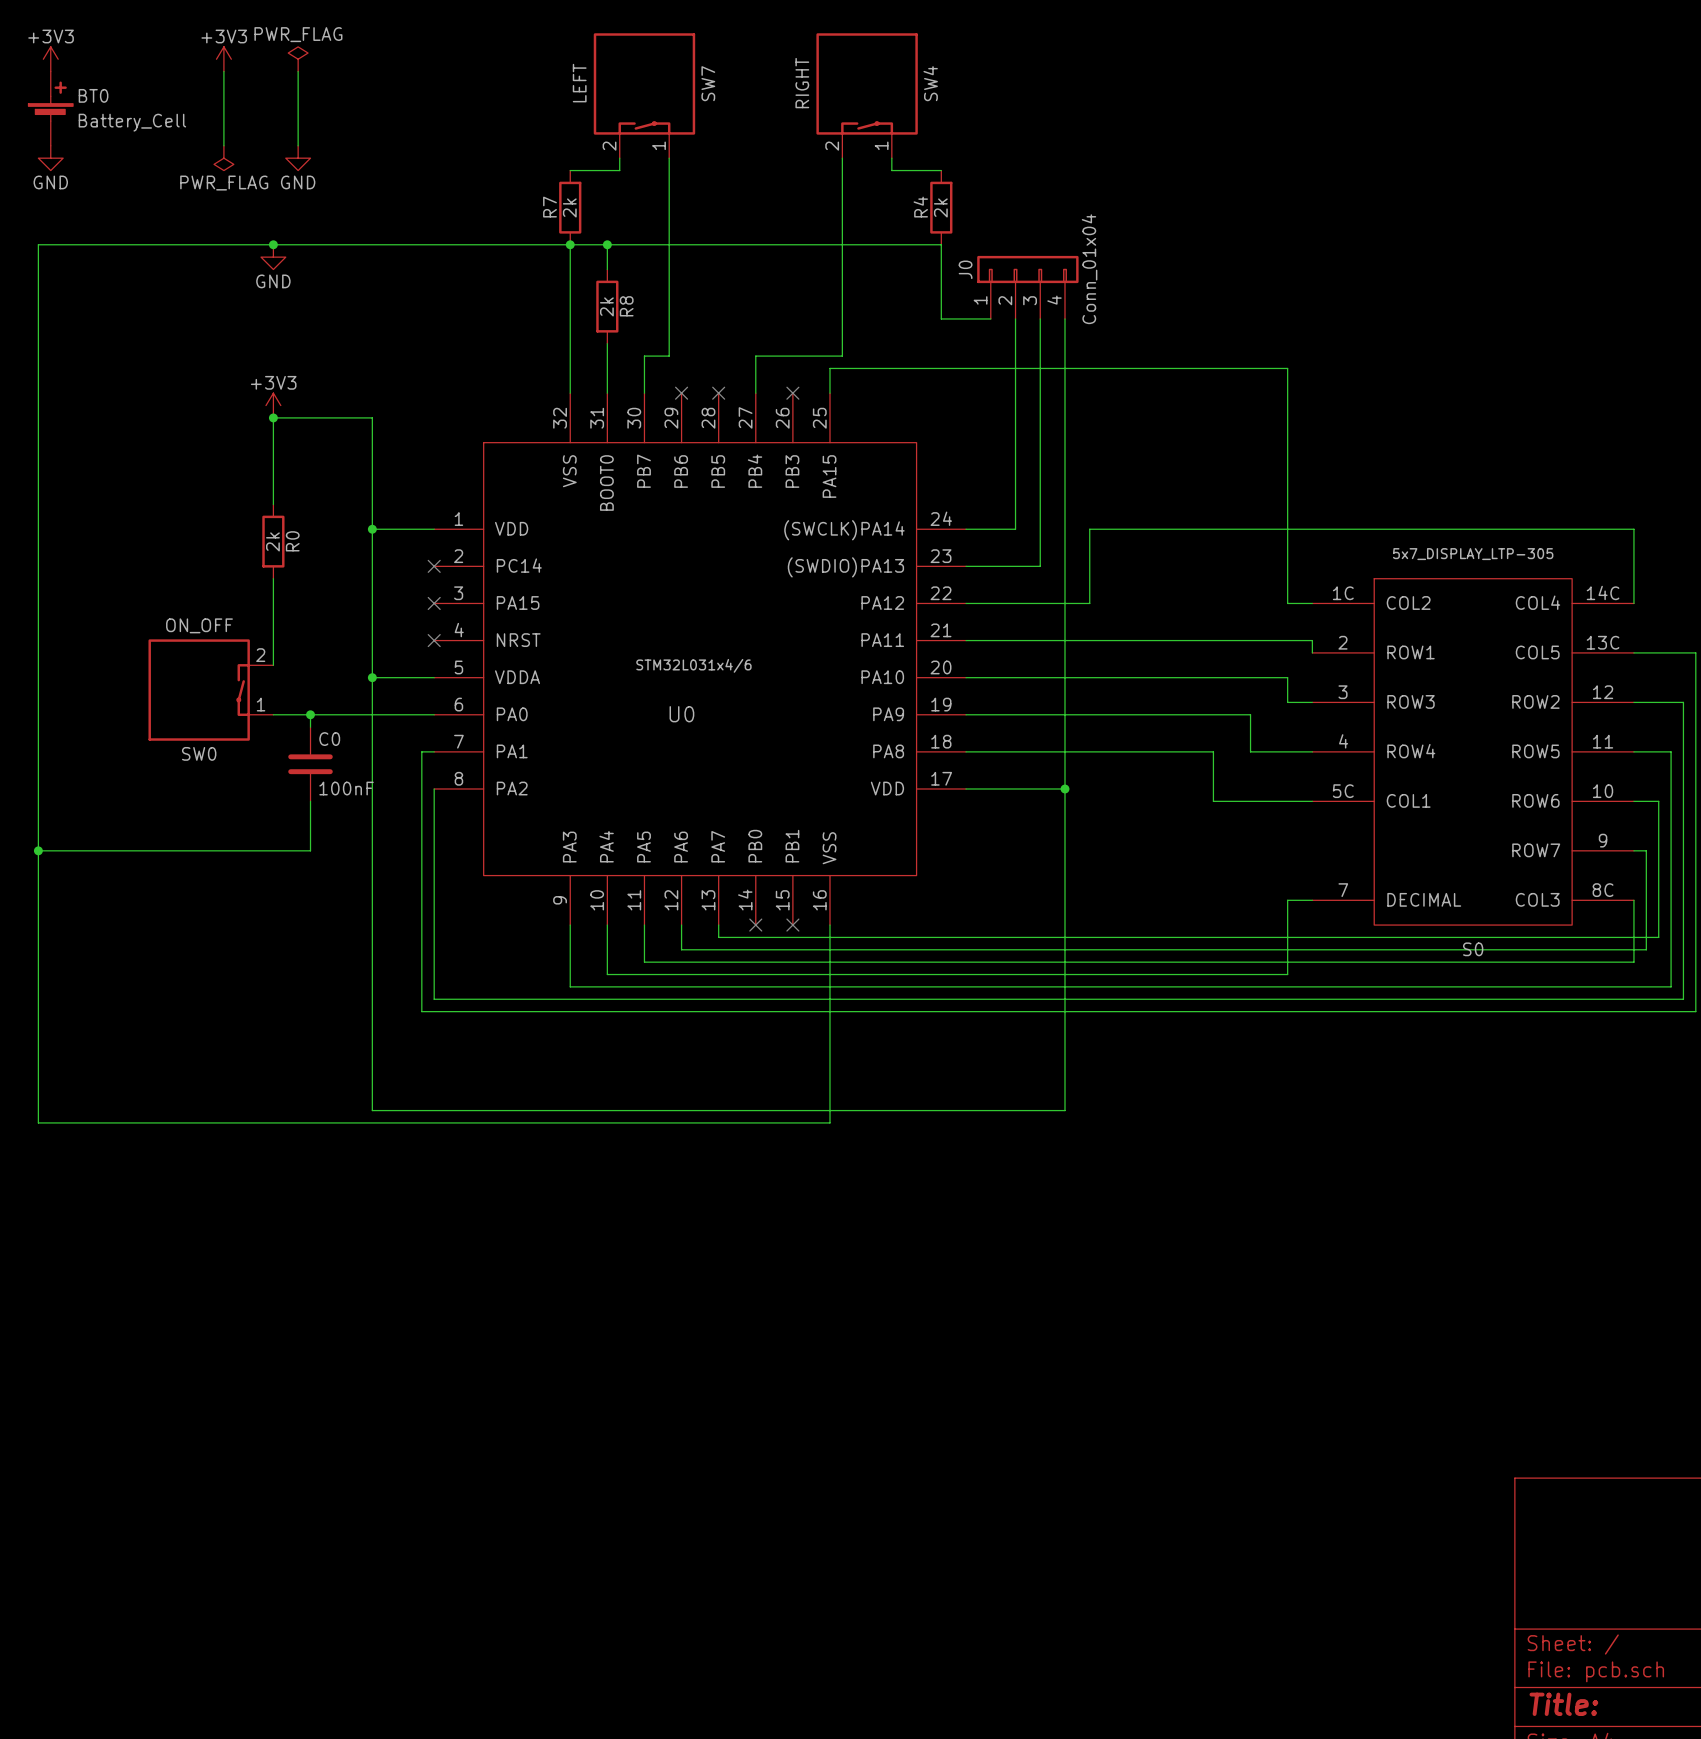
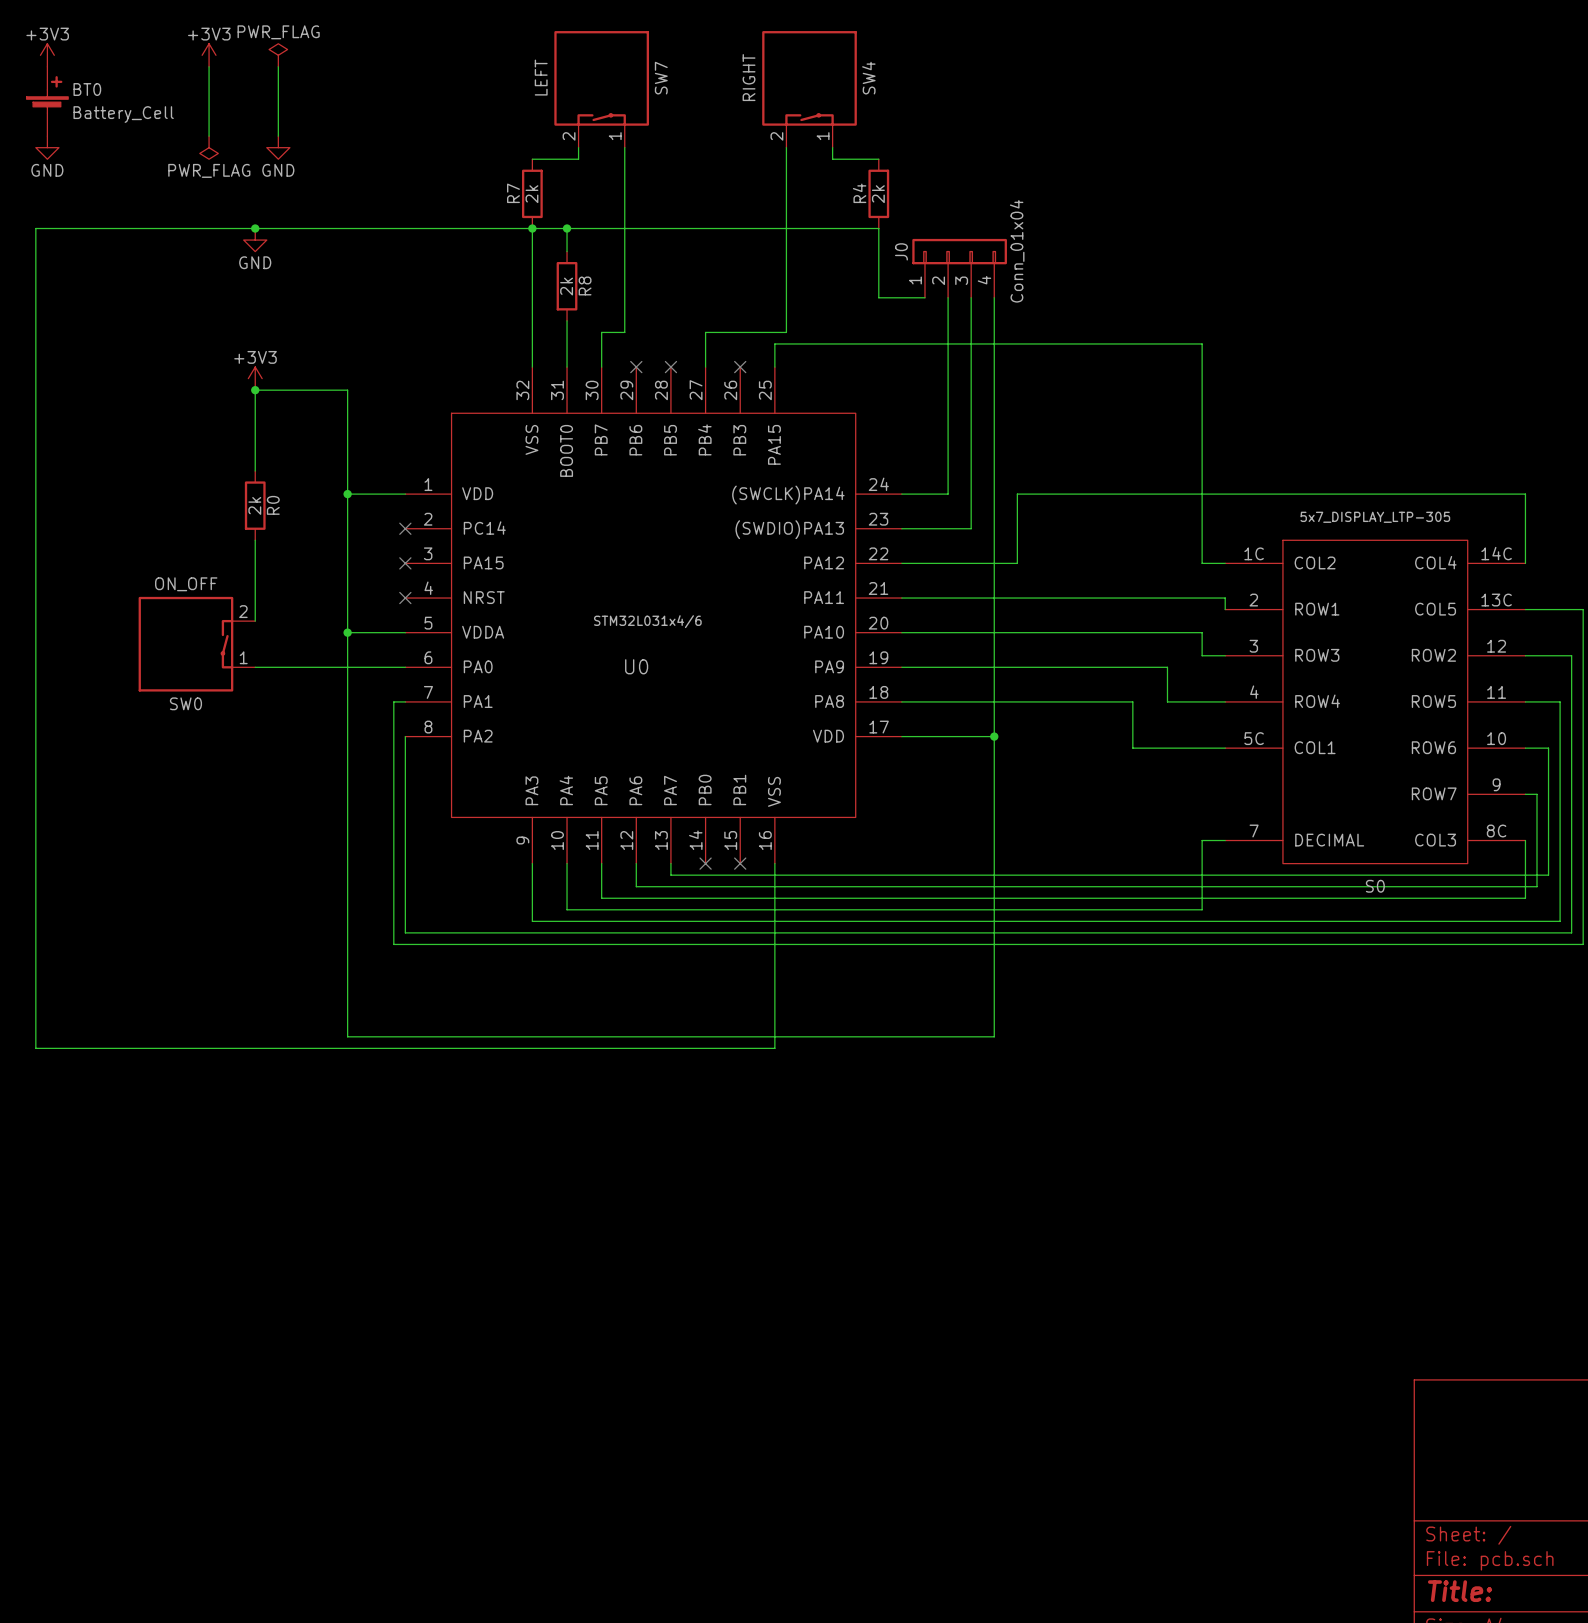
wire: (310, 714) (310, 727) -> none
junction: (310, 714) -> none
C0: 100nF (310, 764) -> none
wire: (310, 801) (310, 850) (38, 850) -> none
junction: (38, 850) -> none

